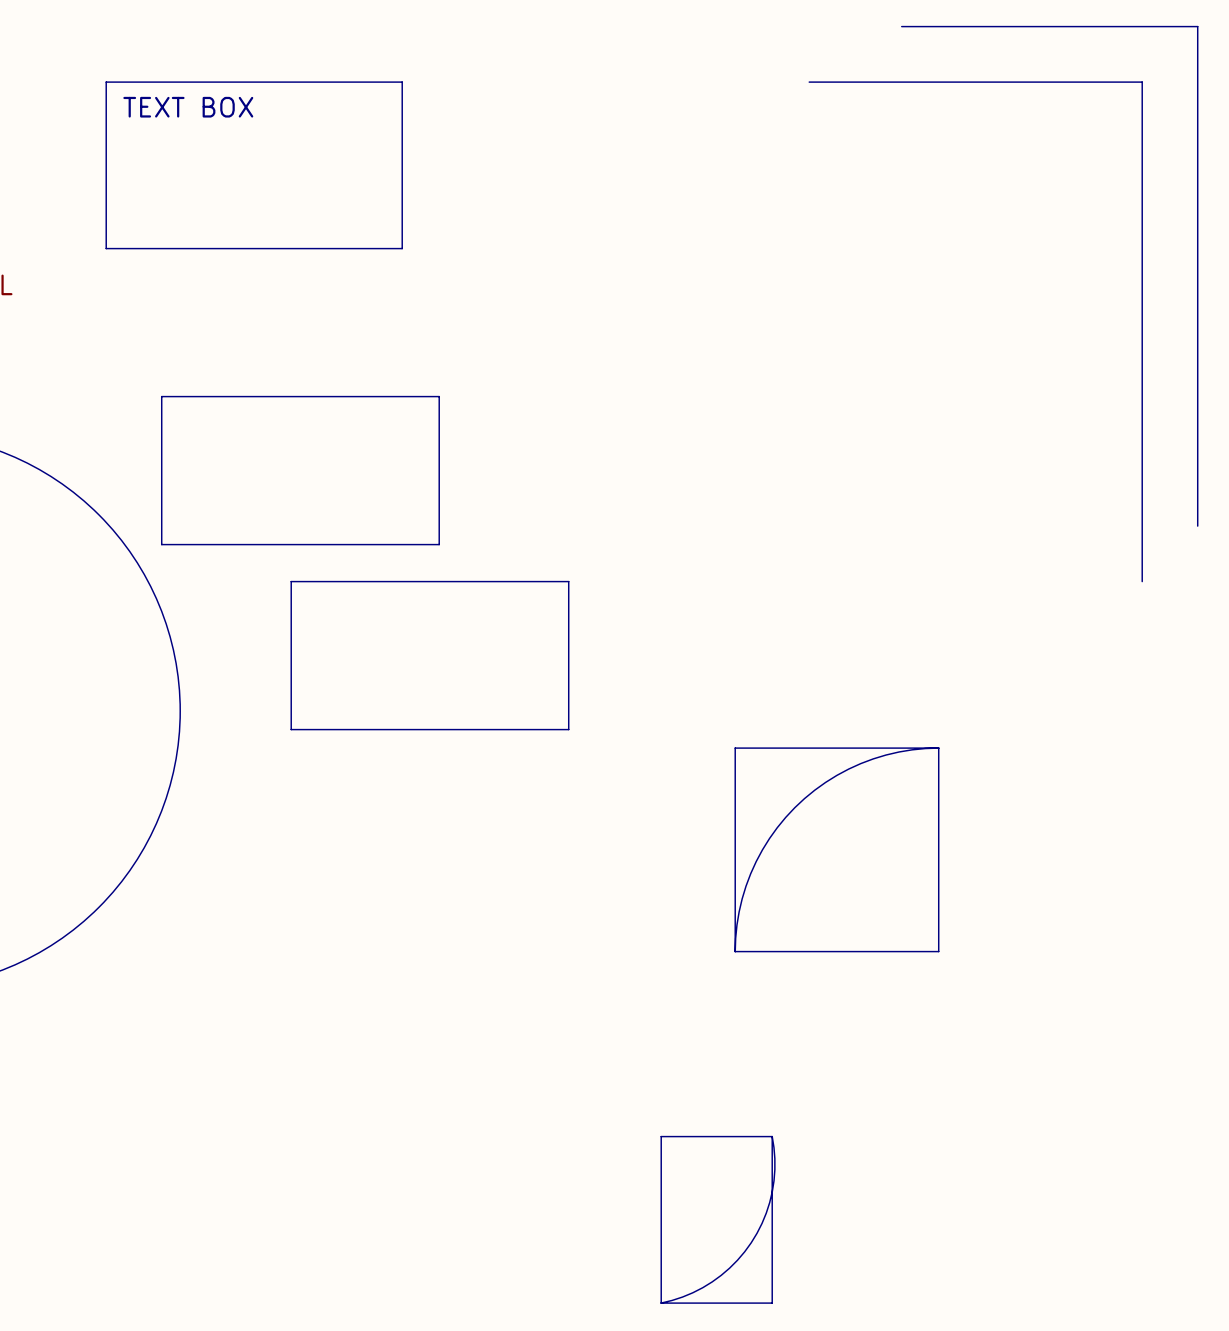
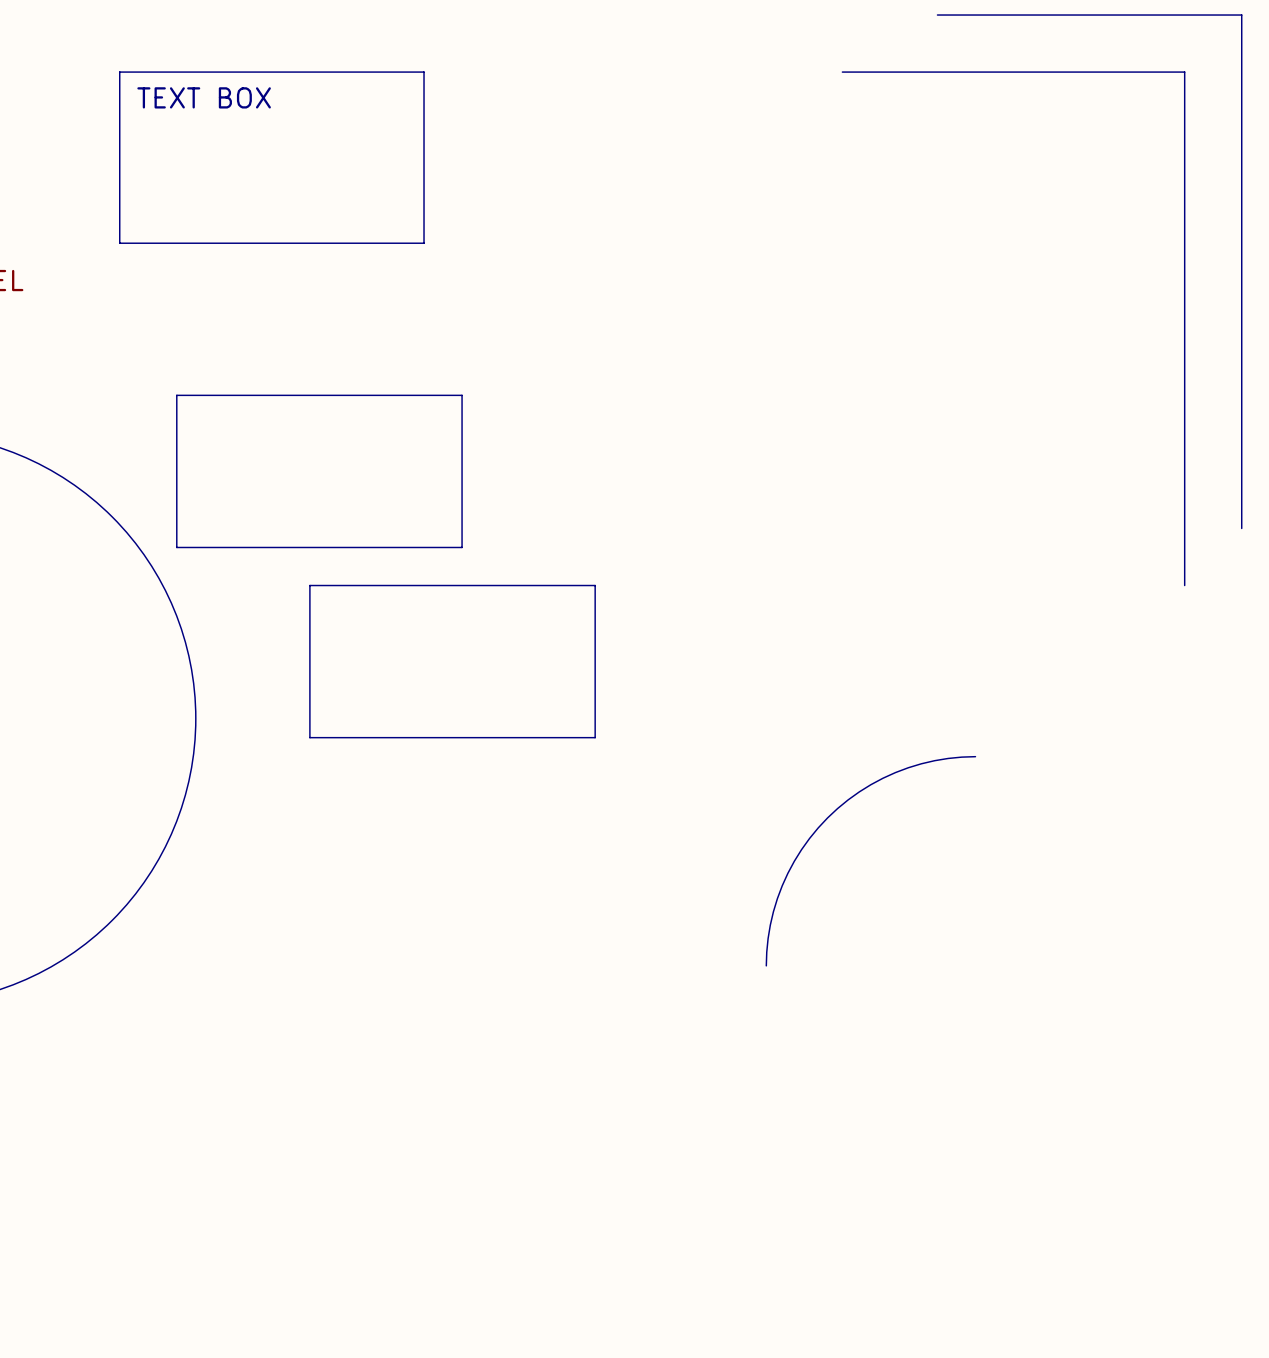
line: (735, 748) (938, 748) (938, 951) (735, 951) (735, 748) -> none
line: (772, 1136) (661, 1136) (661, 1303) -> none
line: (772, 1136) (772, 1303) (661, 1303) -> none
line: (772, 1136) (774, 1158) (772, 1191) (766, 1213) (751, 1242) (729, 1268) (712, 1281) (692, 1292) (661, 1303) -> none

